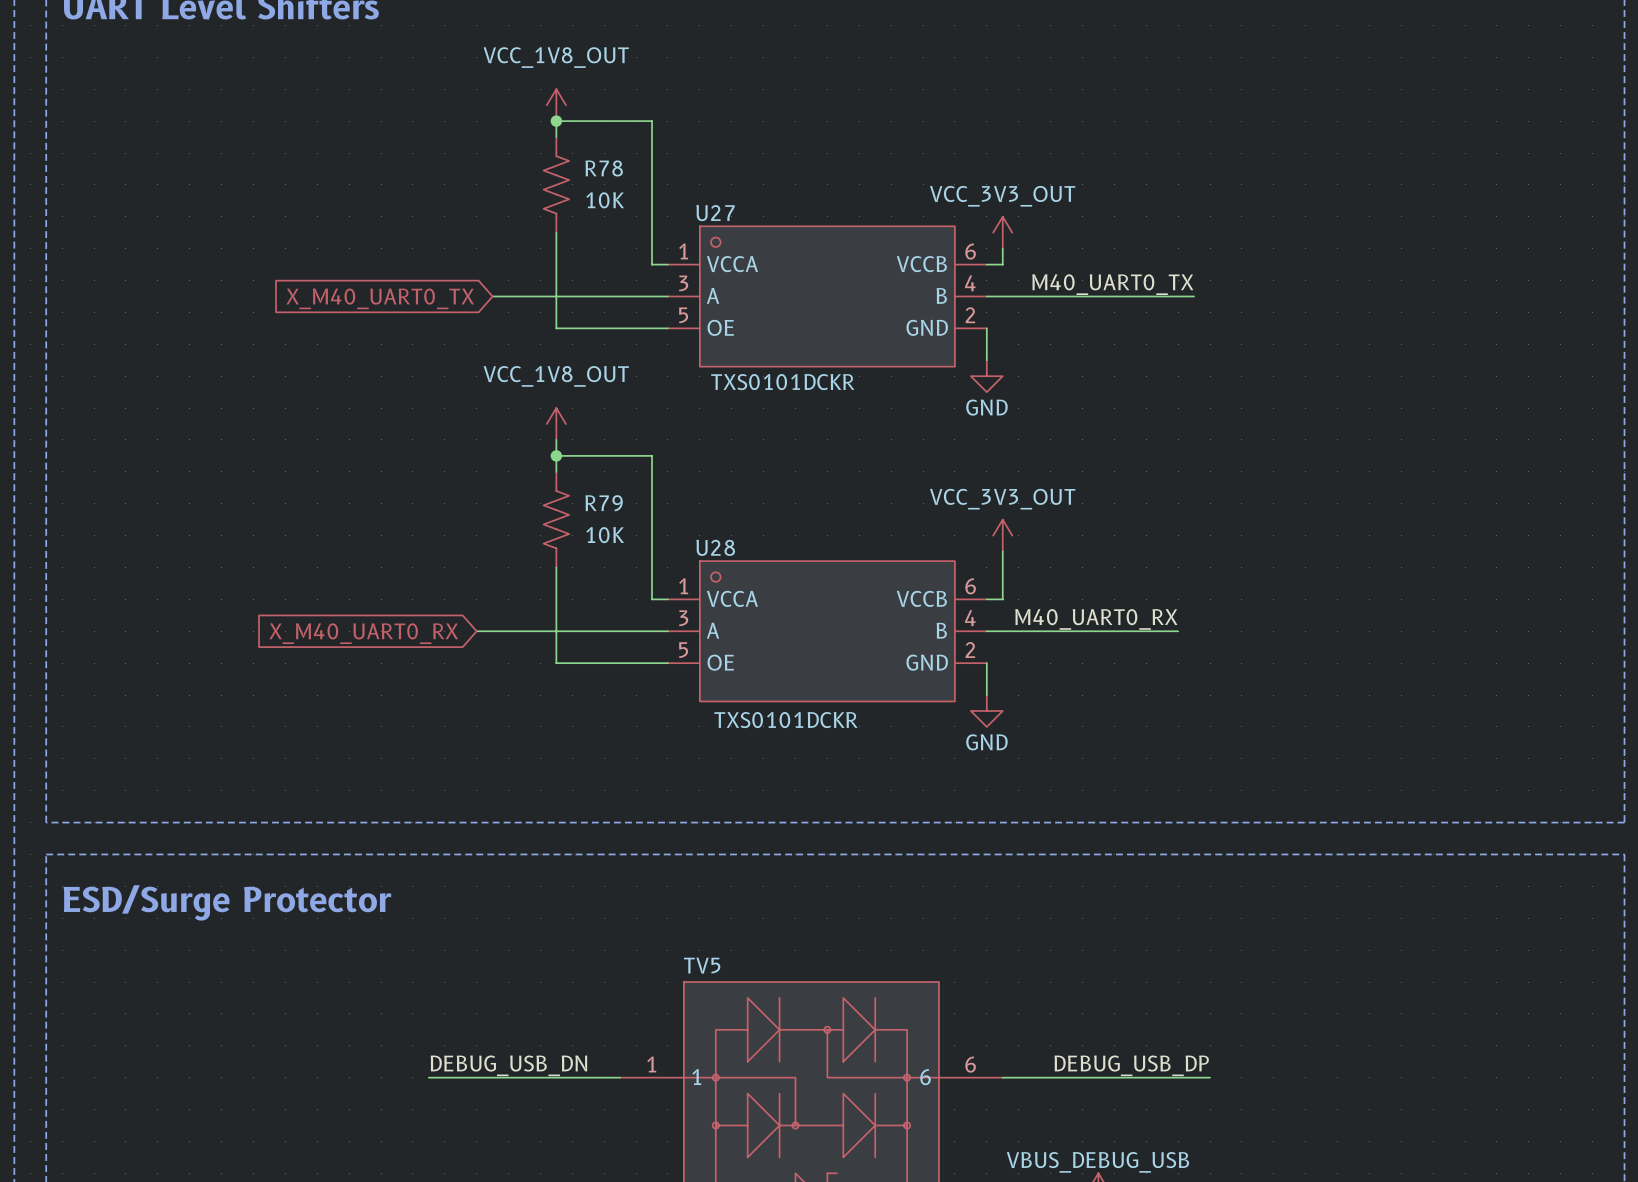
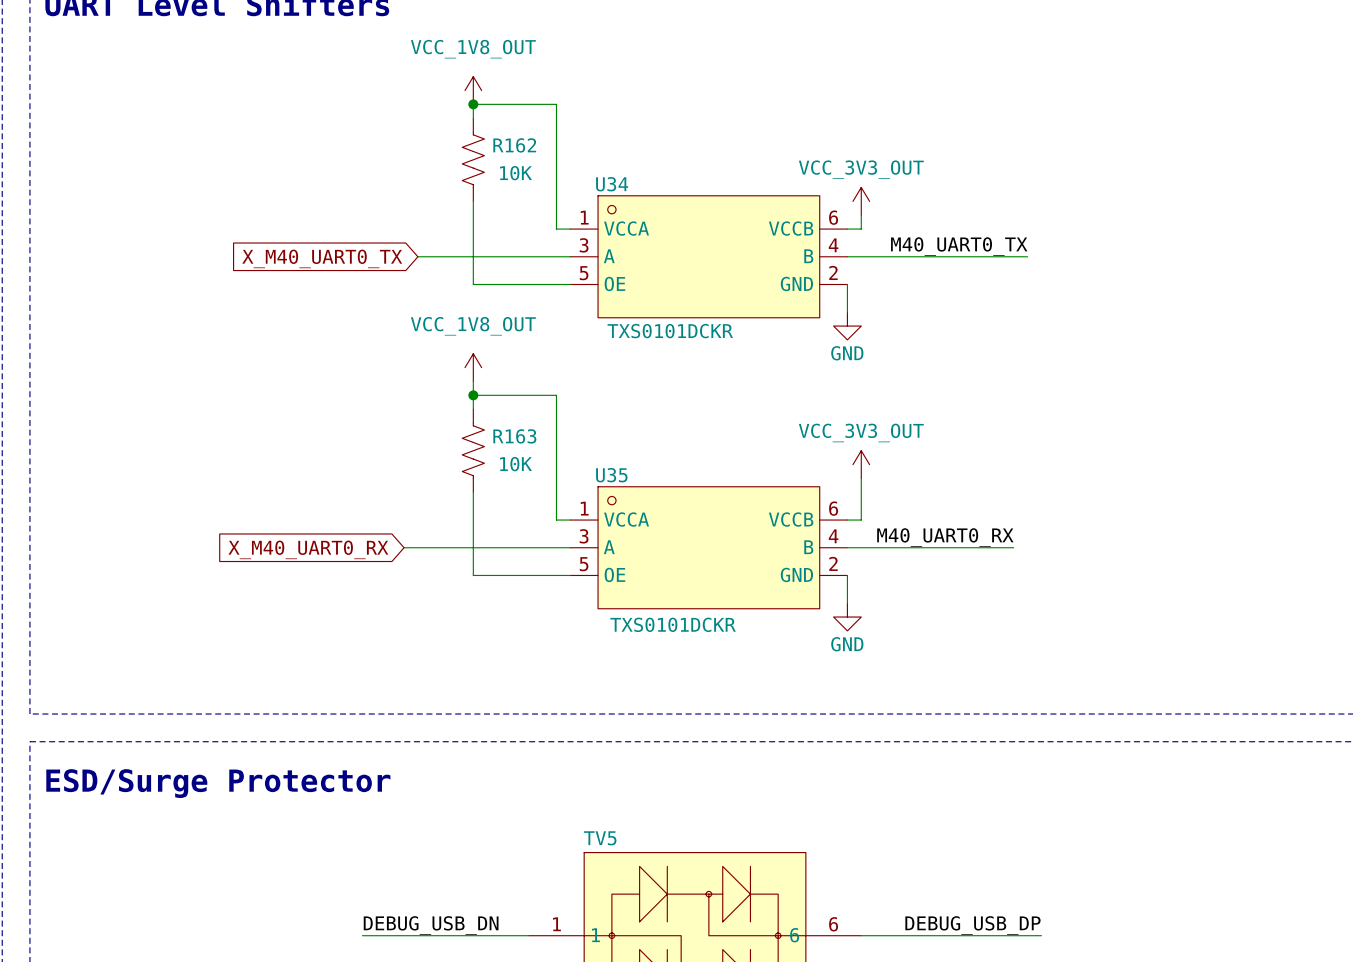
R78 name: R78 (604, 168) -> R162 (514, 145)
U27 name: U27 (715, 213) -> U34 (612, 184)
R79 name: R79 (604, 503) -> R163 (514, 436)
U28 name: U28 (715, 547) -> U35 (611, 475)

